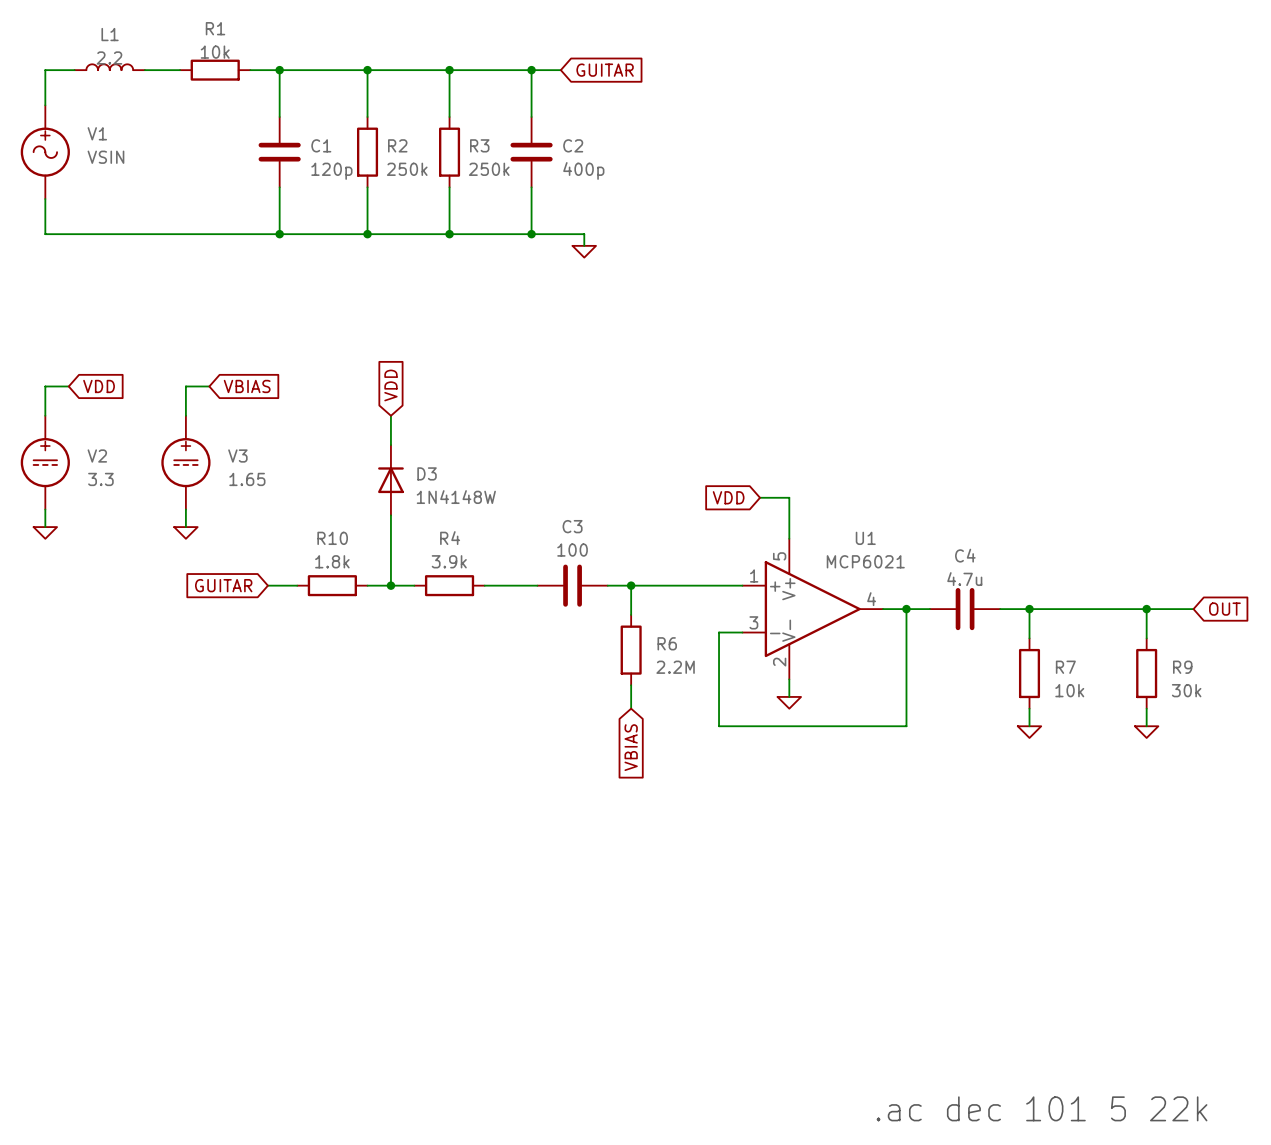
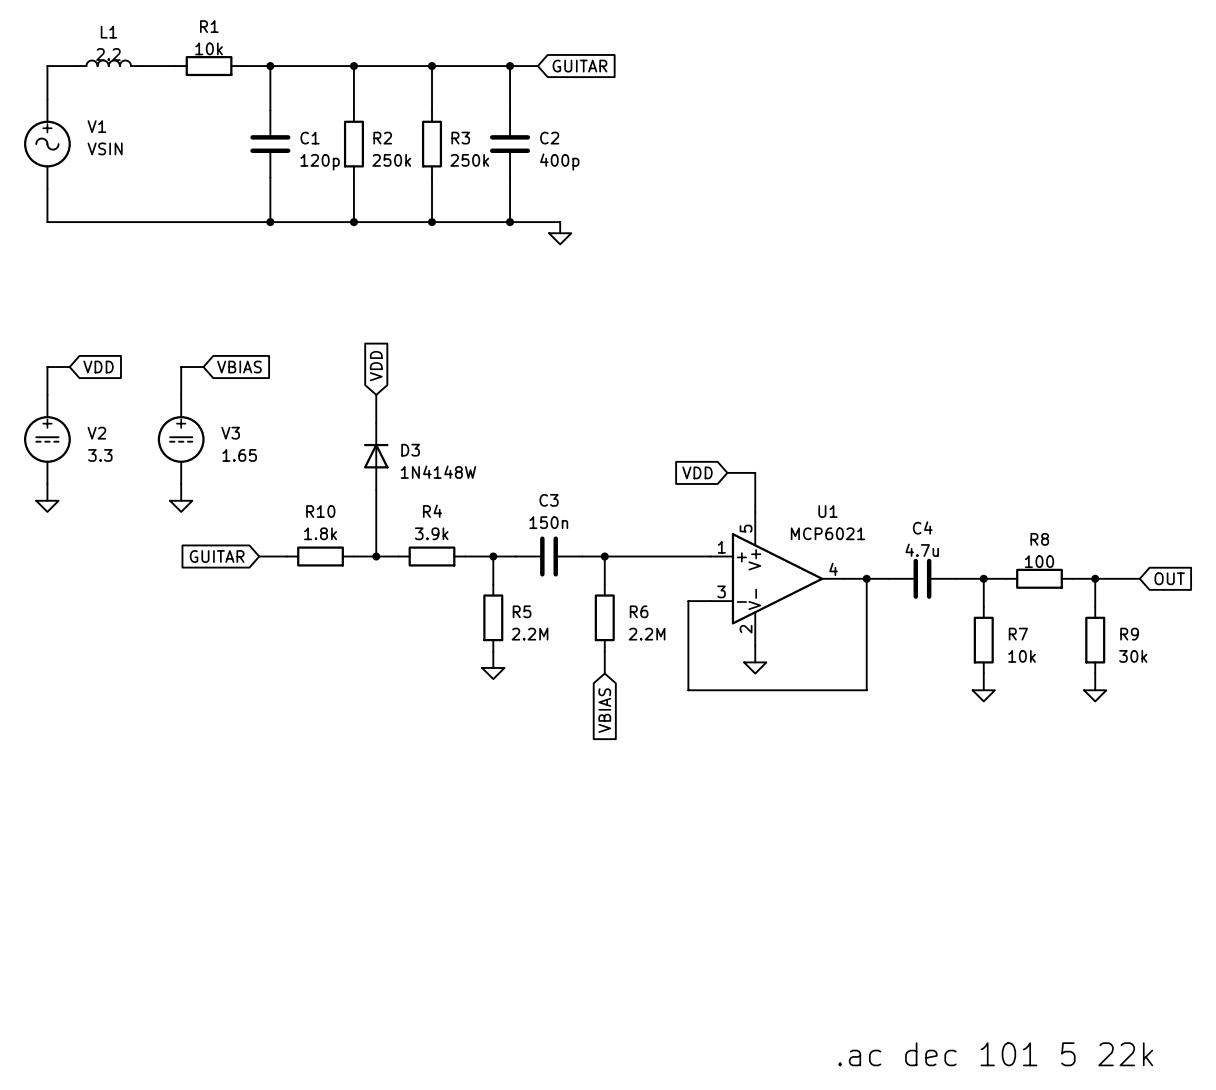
C3 value: 100 (572, 550) -> 150n (548, 522)
wire: none -> (493, 556) (493, 584)
junction: none -> (493, 556)
wire: (1052, 609) (1123, 609) -> none
R8: none -> 100 (1039, 578)
R5: none -> 2.2M (493, 617)
wire: none -> (493, 651) (493, 667)
power symbol: none -> (493, 673)

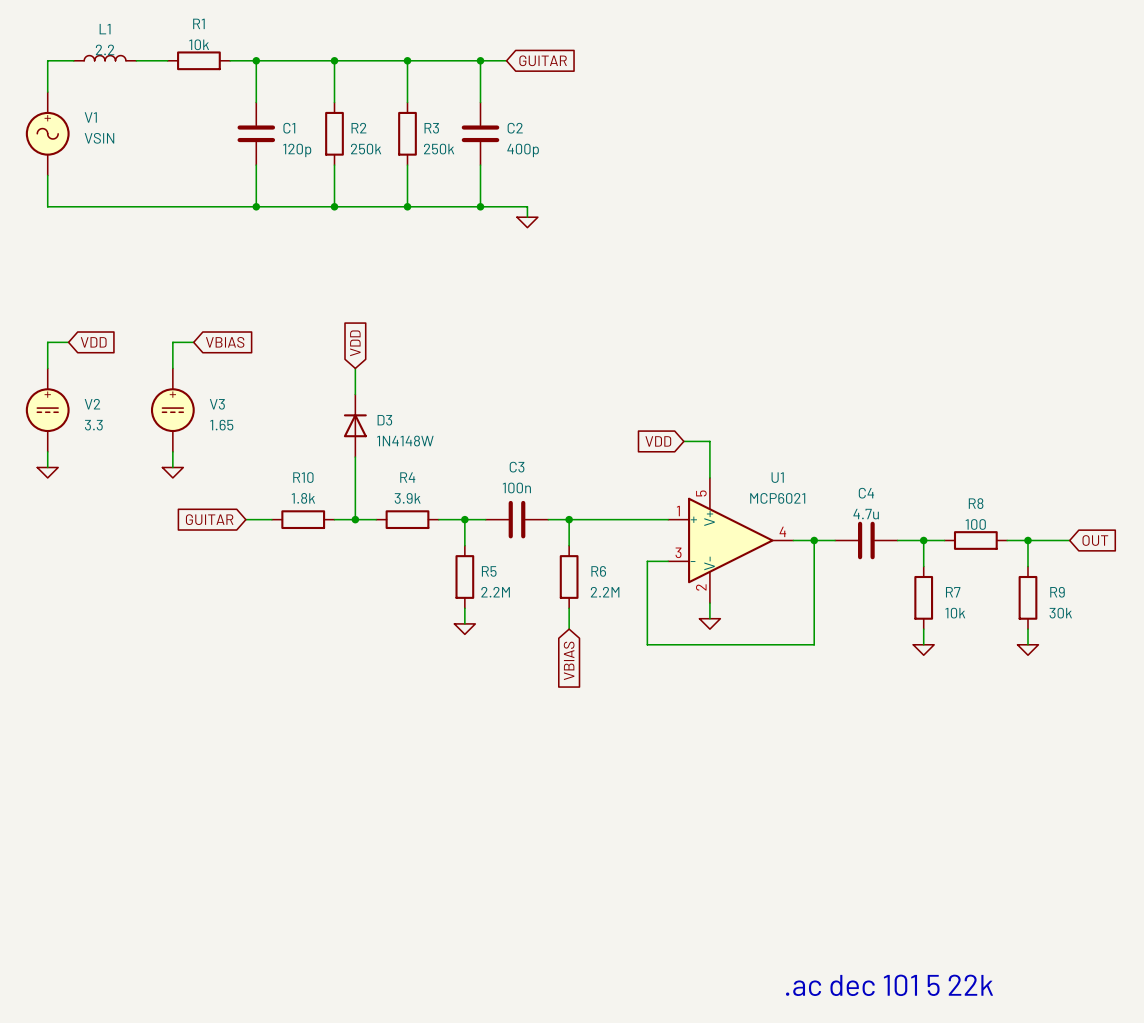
C3 value: 150n (548, 522) -> 100n (516, 487)

